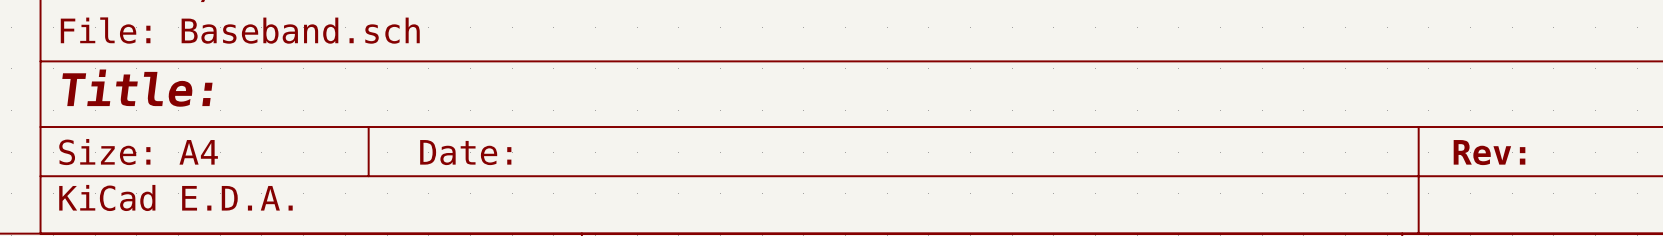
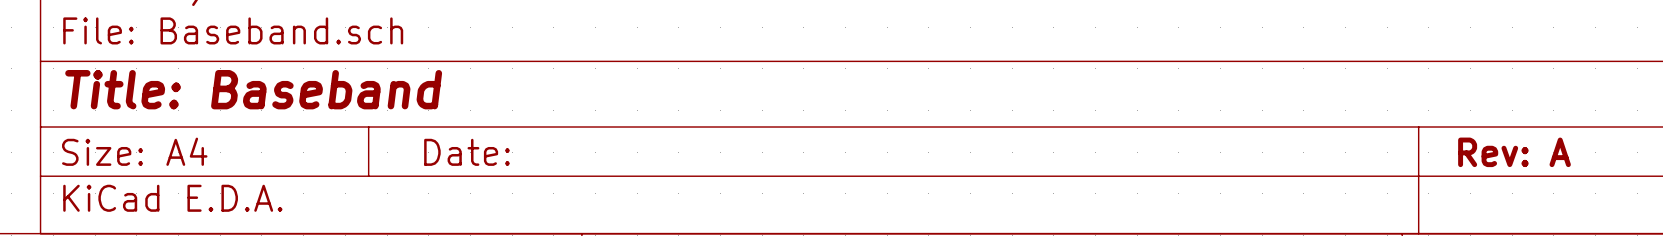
title block: Title: (137, 88) -> Title: Baseband (253, 89)
title block: Rev: (1489, 152) -> Rev: A (1514, 152)

